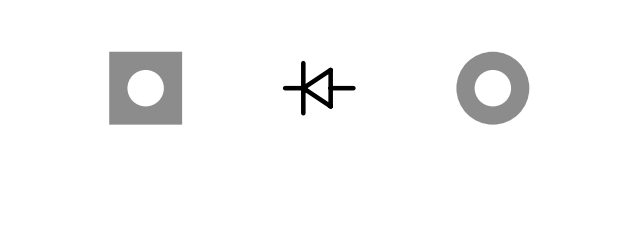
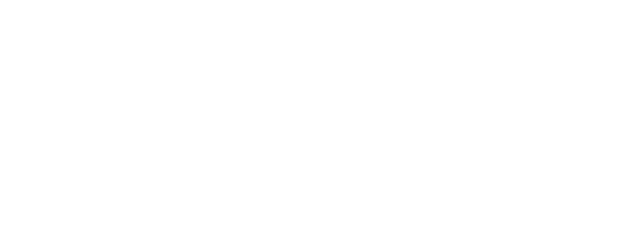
part: (319, 88) -> none

